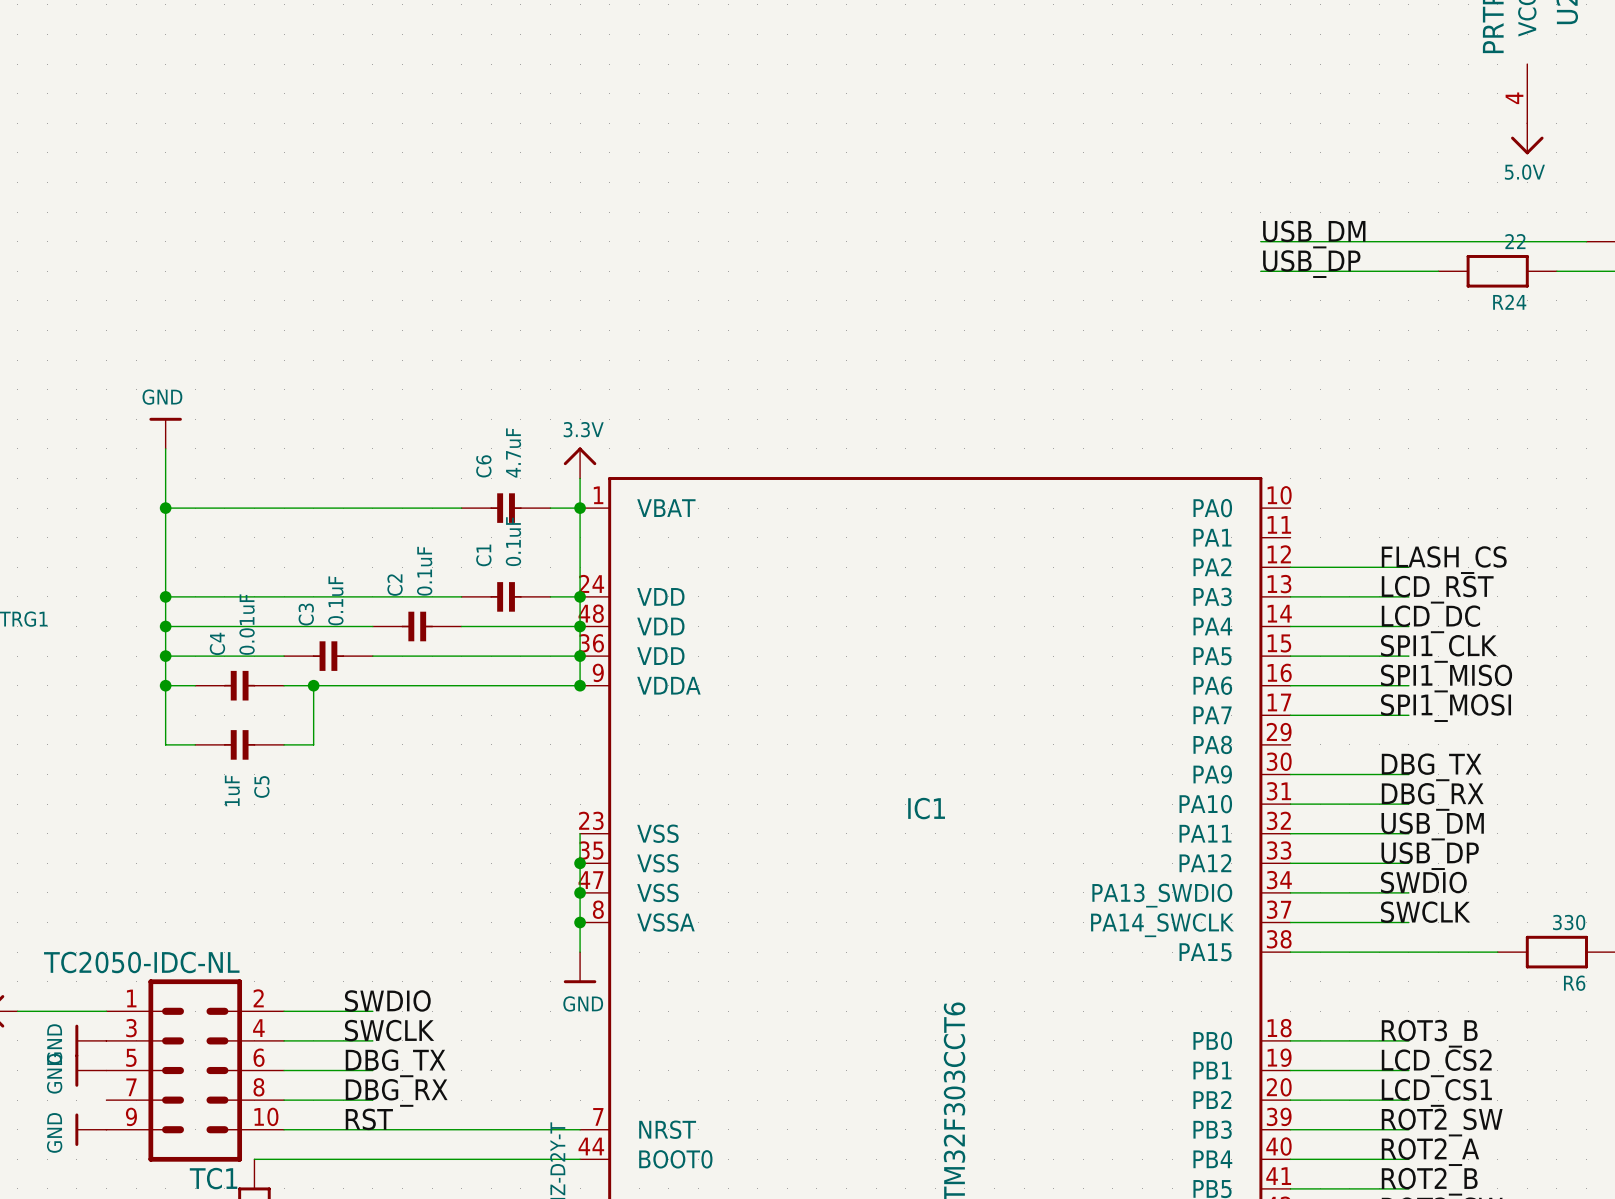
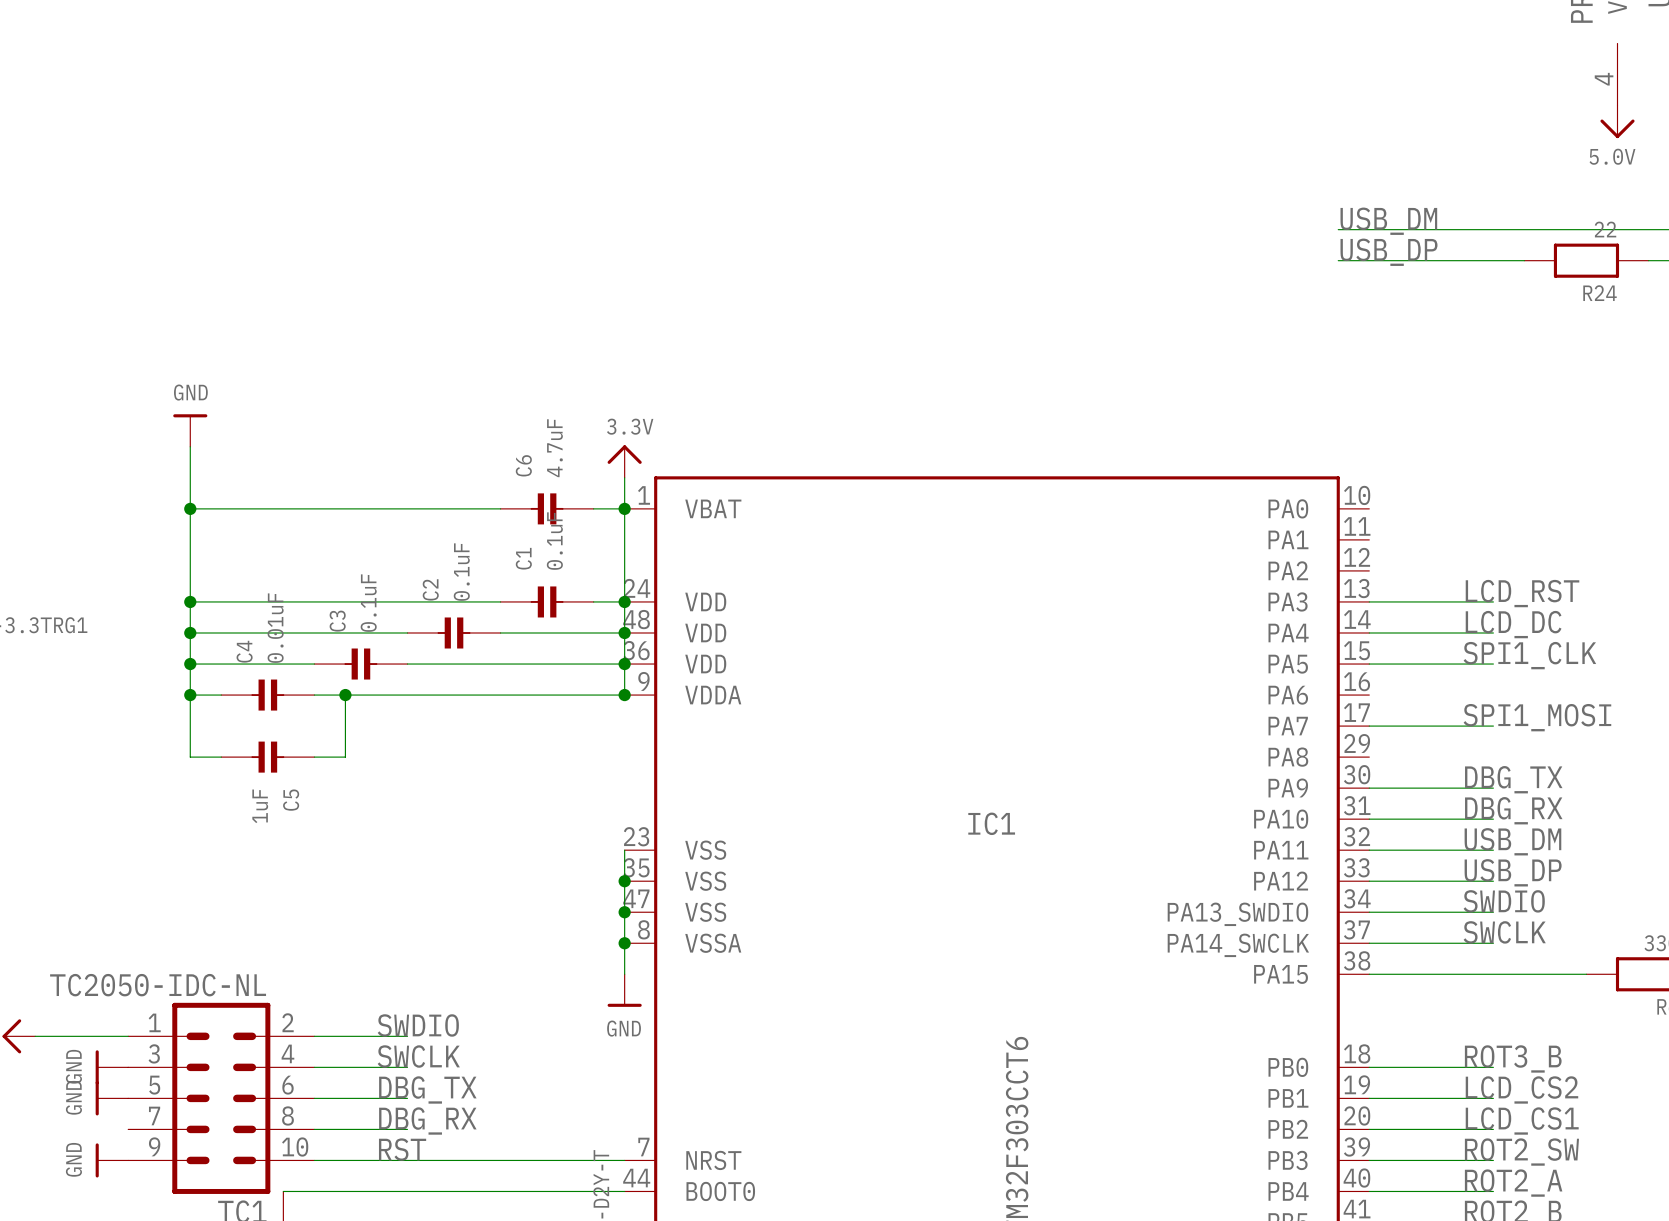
label: FLASH_CS (1444, 560) -> none
wire: (1290, 567) (1408, 567) -> none
label: SPI1_MISO (1446, 678) -> none
wire: (1290, 685) (1408, 685) -> none

